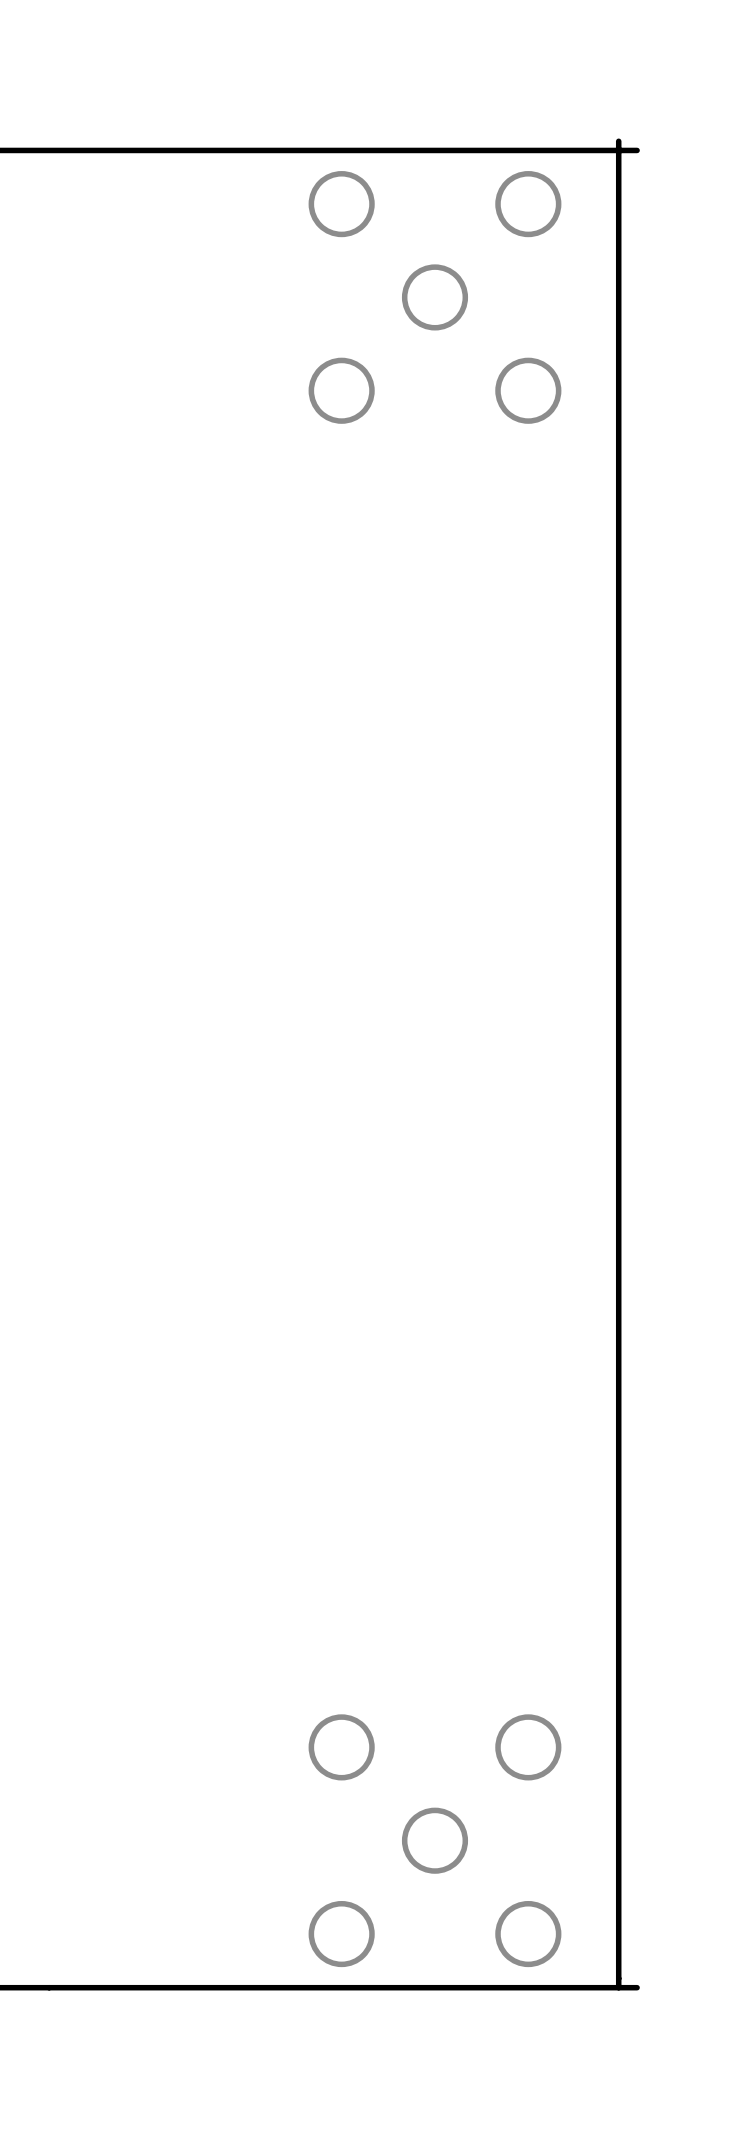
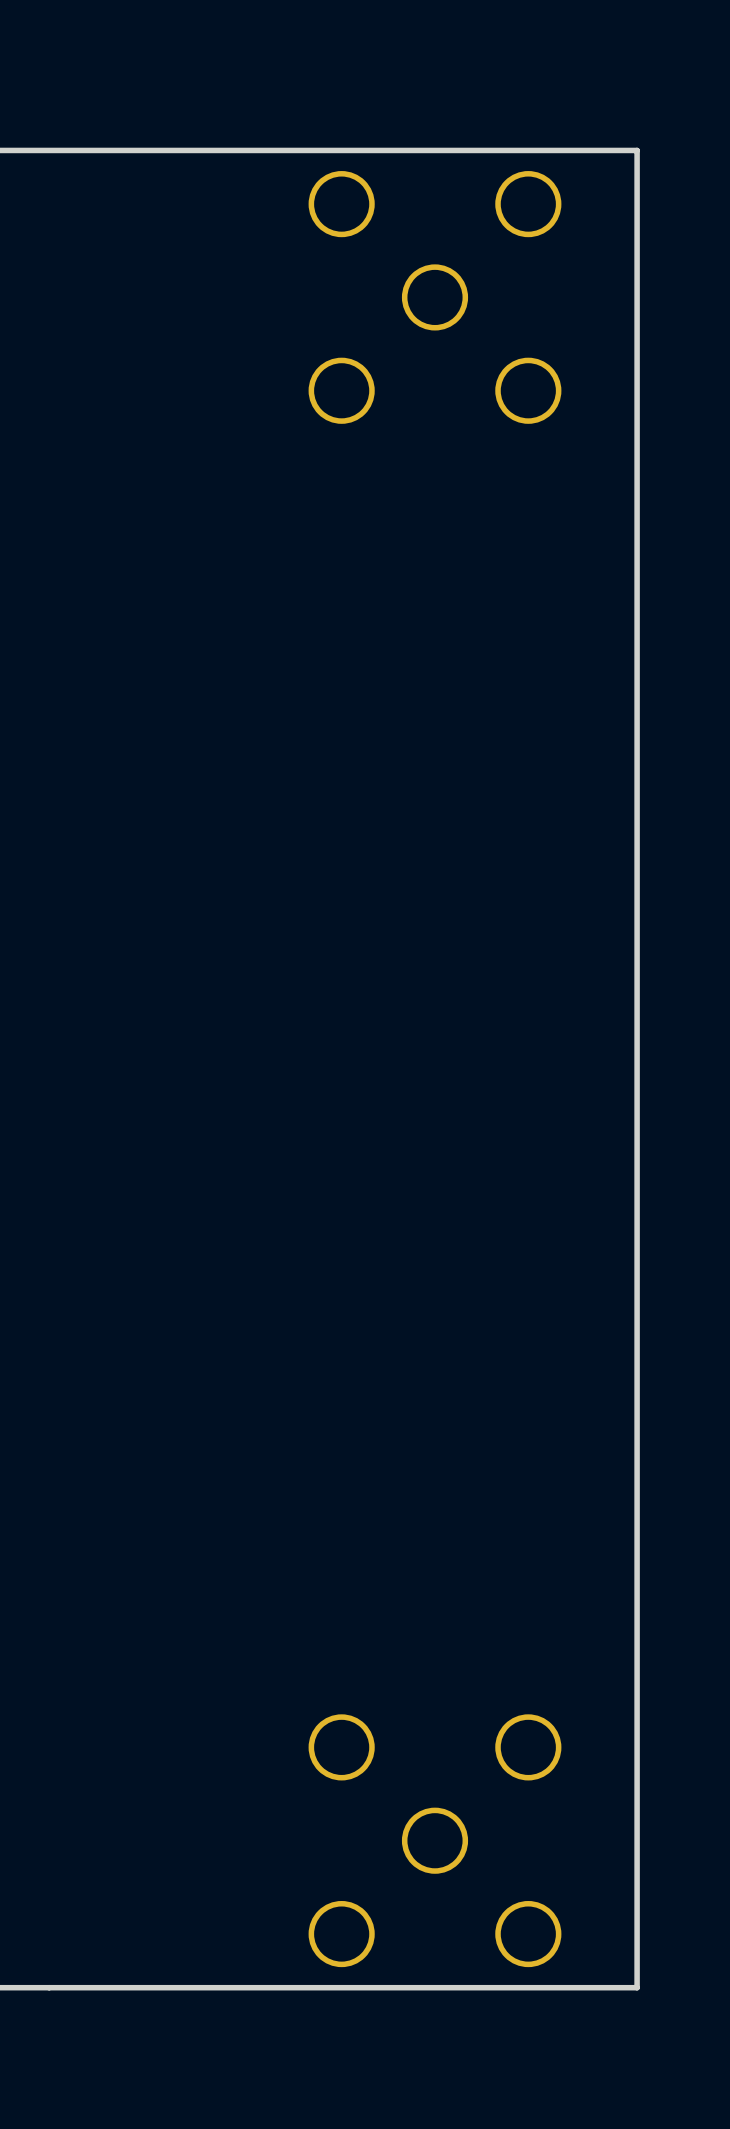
board edge: (618, 141) (618, 1987) -> none
board edge: none -> (637, 150) (637, 1987)

